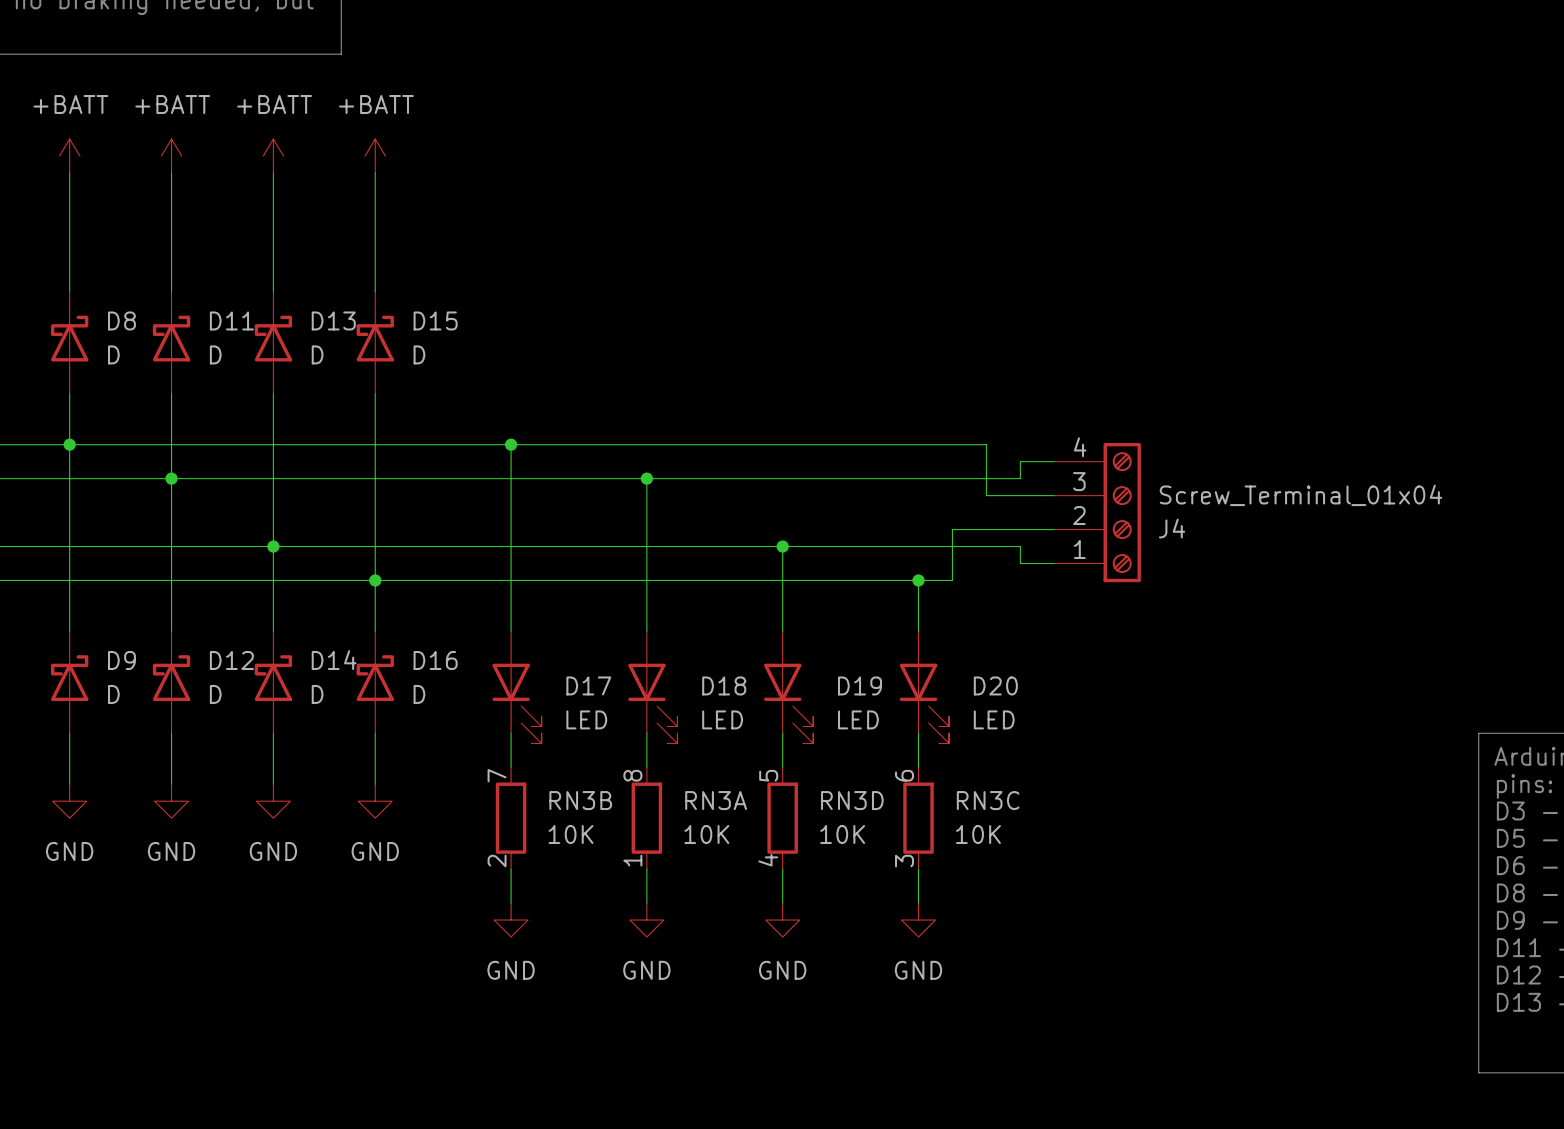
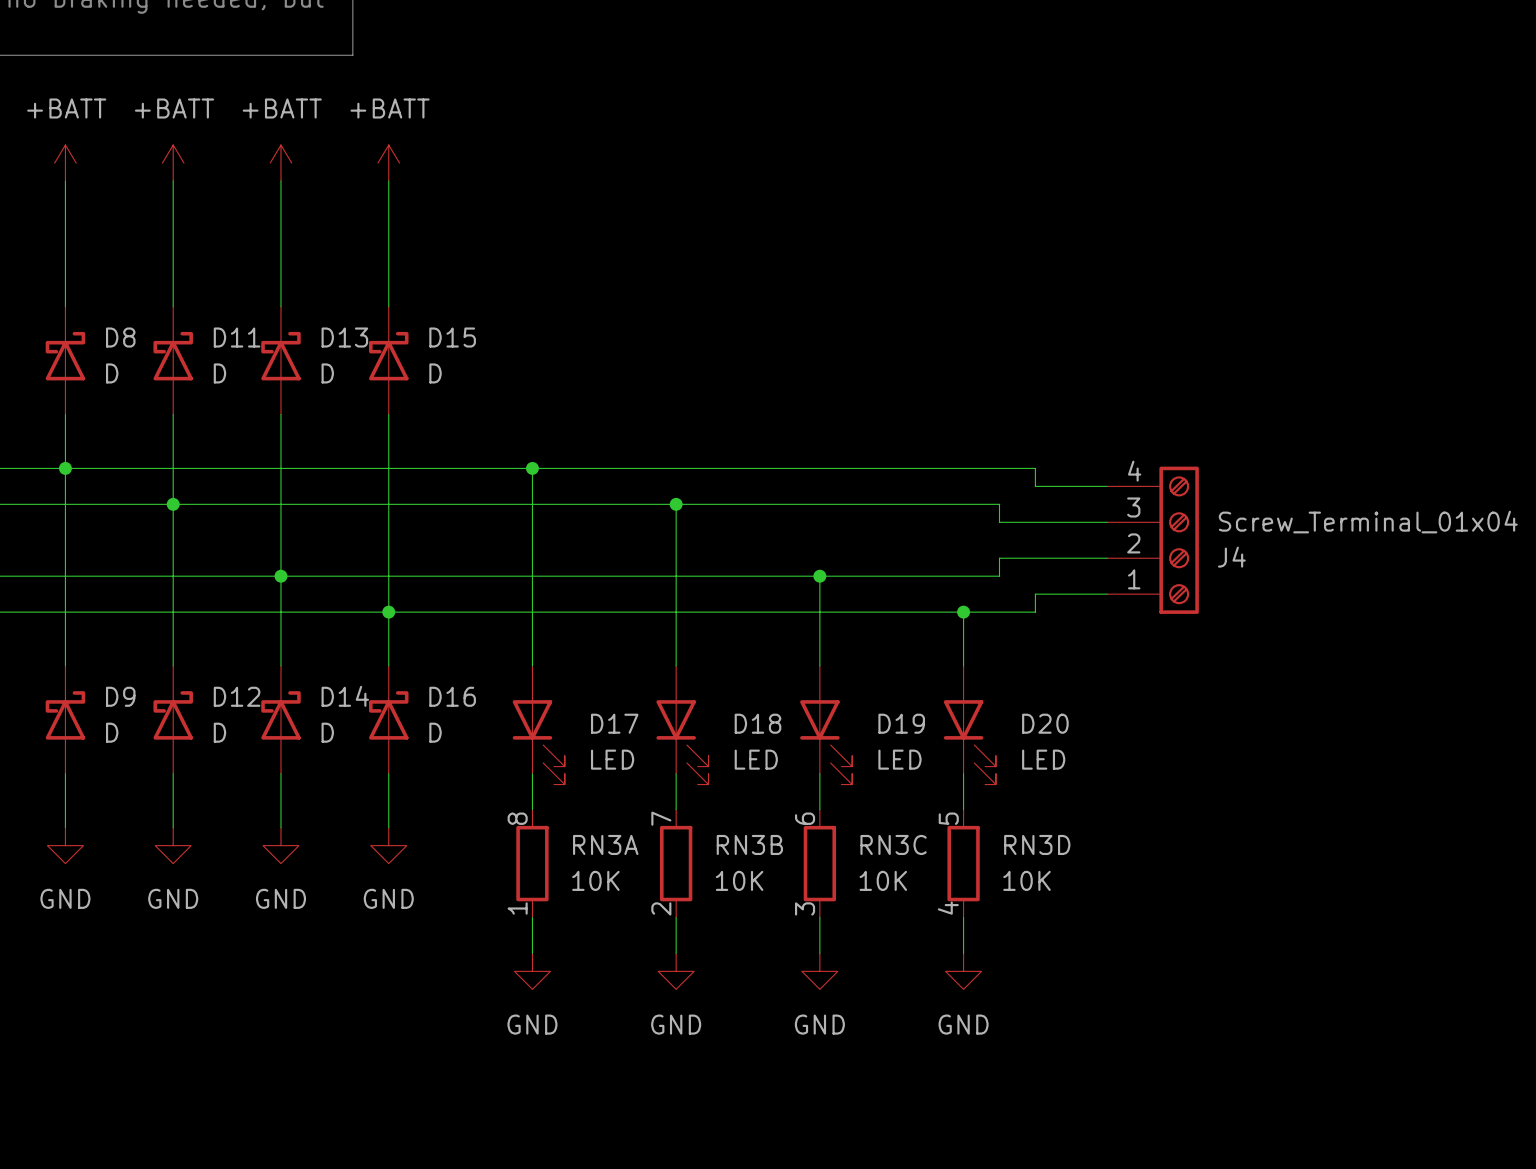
wire: (986, 461) (986, 495) -> (999, 504) (999, 522) (1035, 522)
wire: (1020, 461) (1020, 478) (952, 478) -> (1071, 486) (1035, 486)
wire: (1020, 563) (1020, 546) (952, 546) (952, 580) -> (1071, 594) (1035, 594) (1035, 612) (999, 612)
RN3B position: (511, 818) -> (676, 863)
RN3A position: (646, 818) -> (532, 863)
RN3D position: (782, 818) -> (963, 863)
RN3C position: (918, 818) -> (819, 863)

